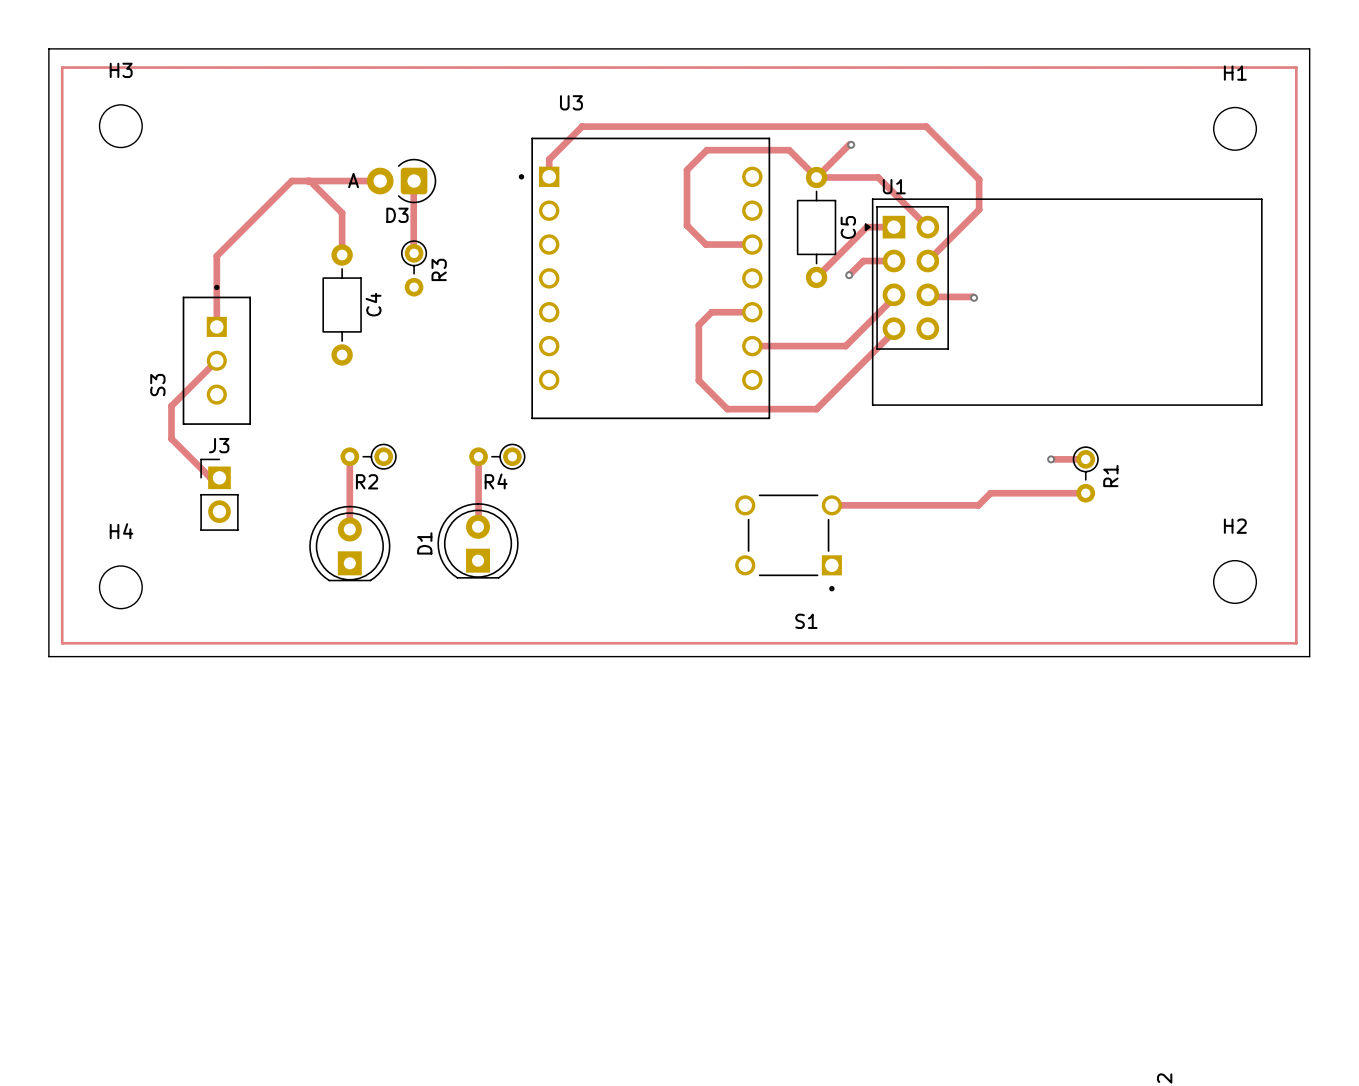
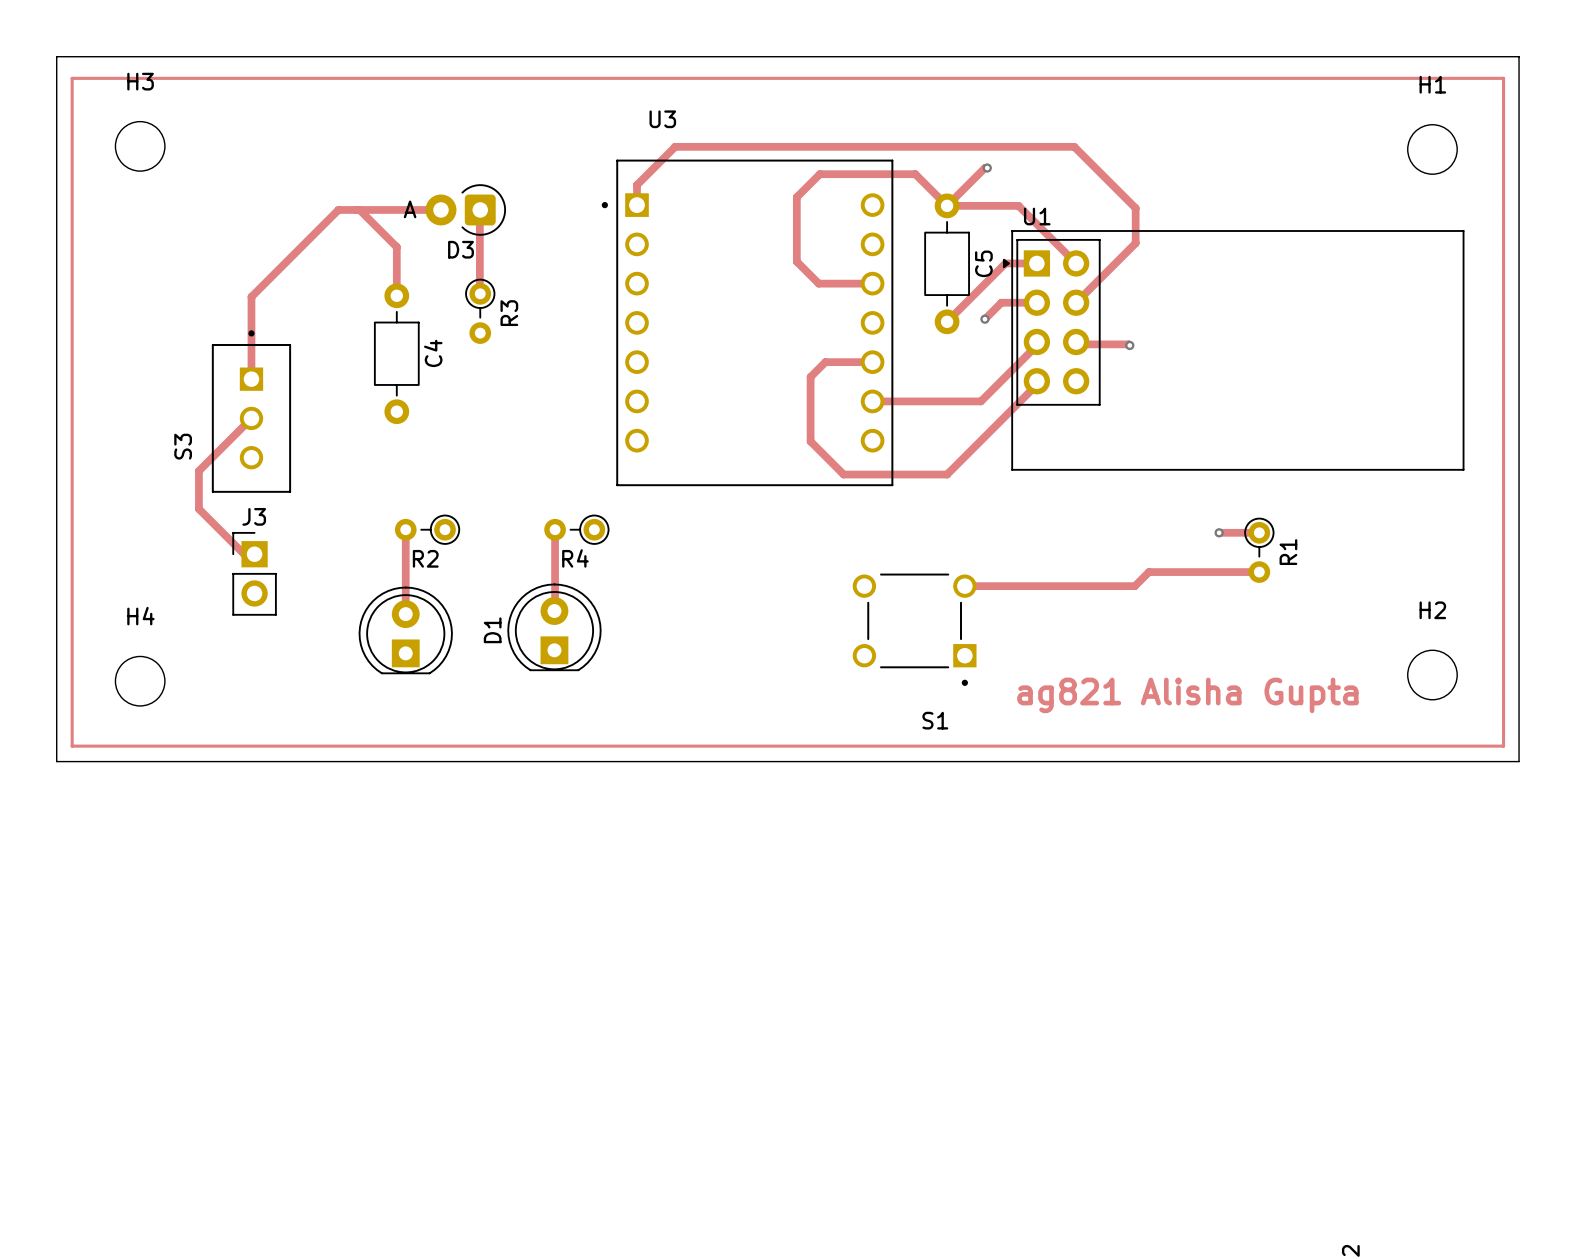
text: none -> ag821 Alisha Gupta (1187, 695)

